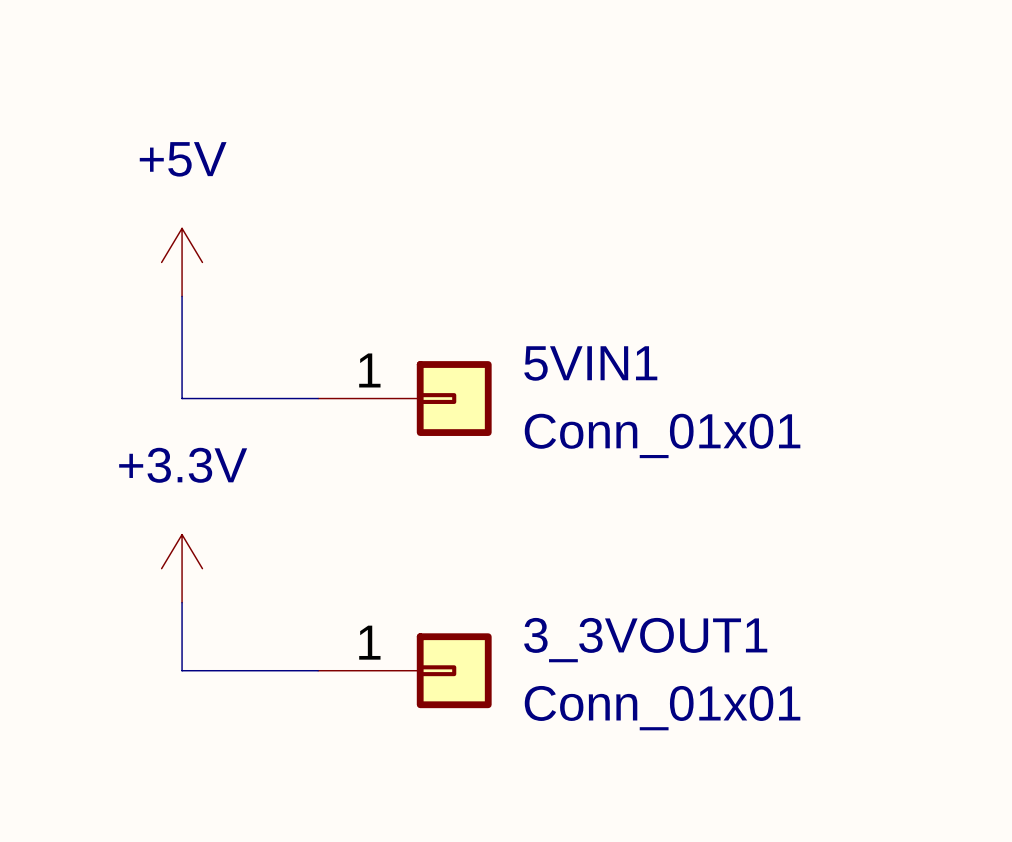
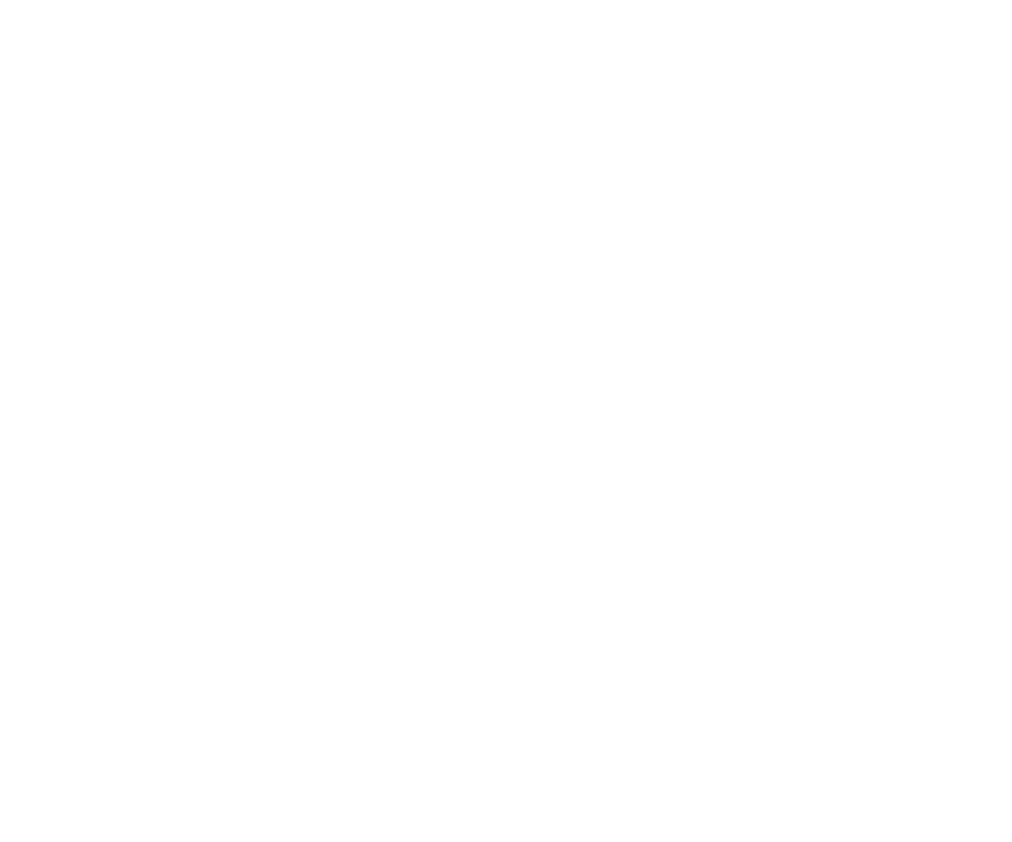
power symbol: +5V (182, 262) -> none
wire: (182, 296) (182, 398) (318, 398) -> none
5VIN1: Conn_01x01 (404, 398) -> none
power symbol: +3.3V (182, 568) -> none
wire: (182, 602) (182, 670) (318, 670) -> none
3_3VOUT1: Conn_01x01 (404, 670) -> none

